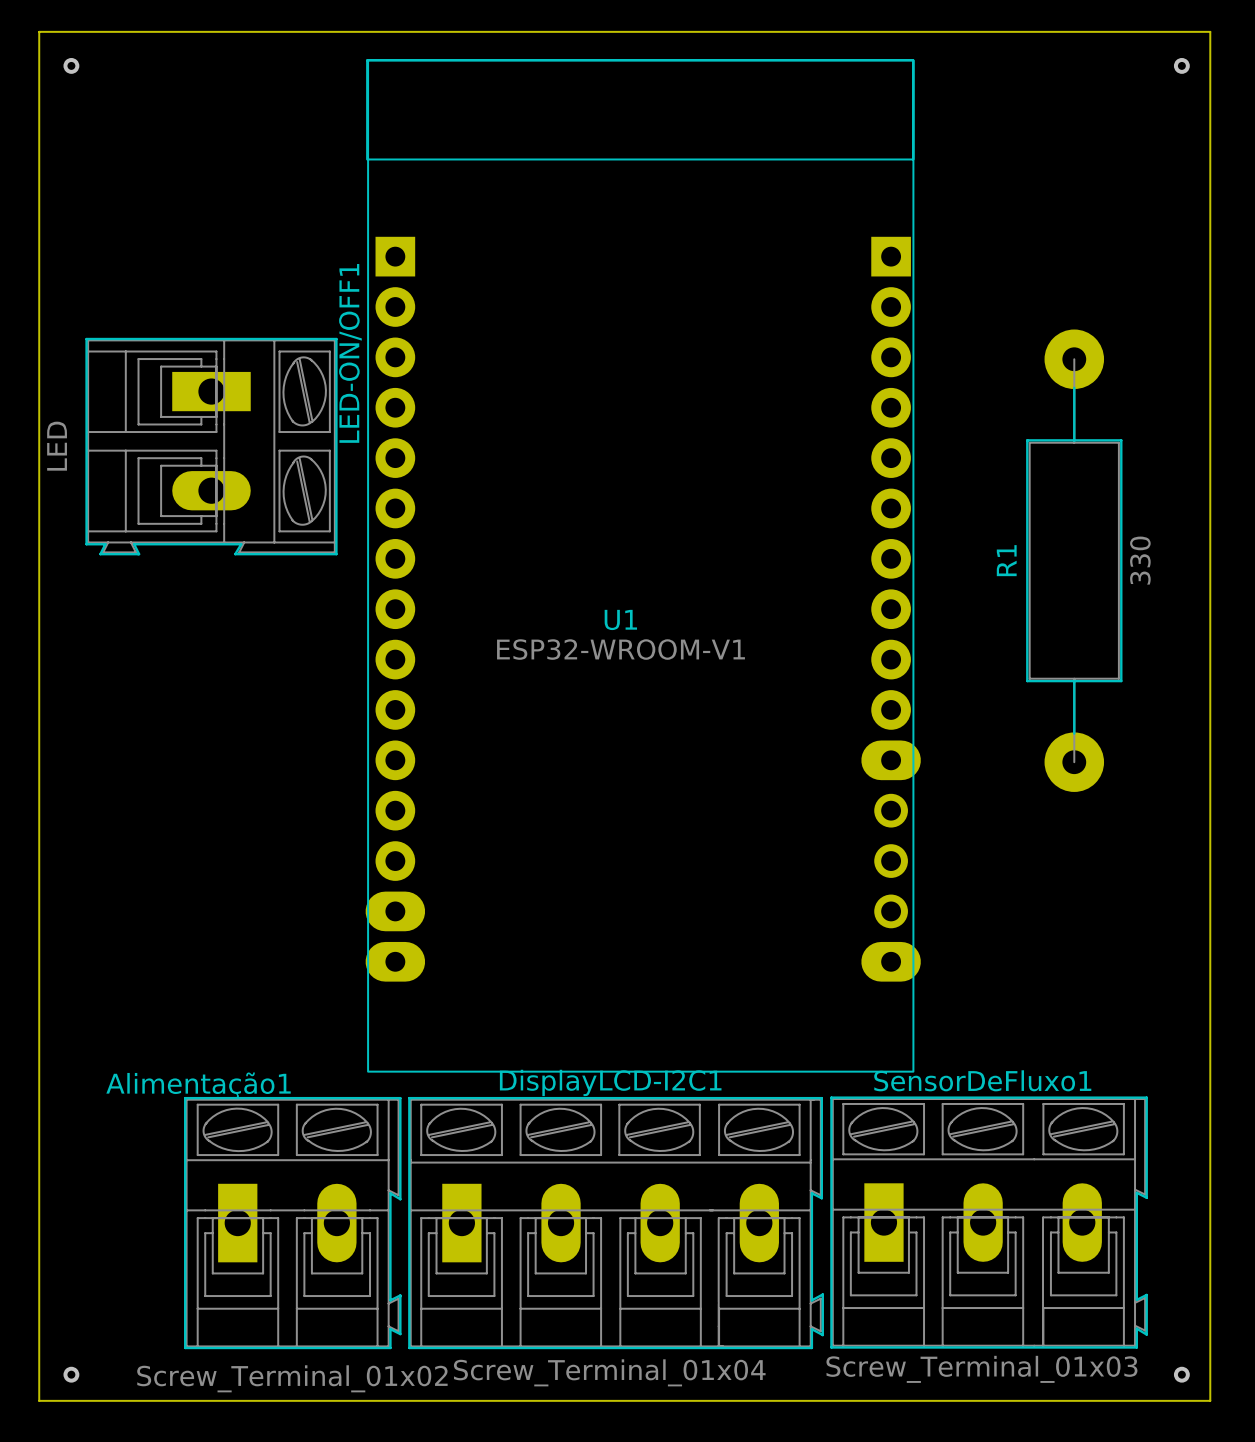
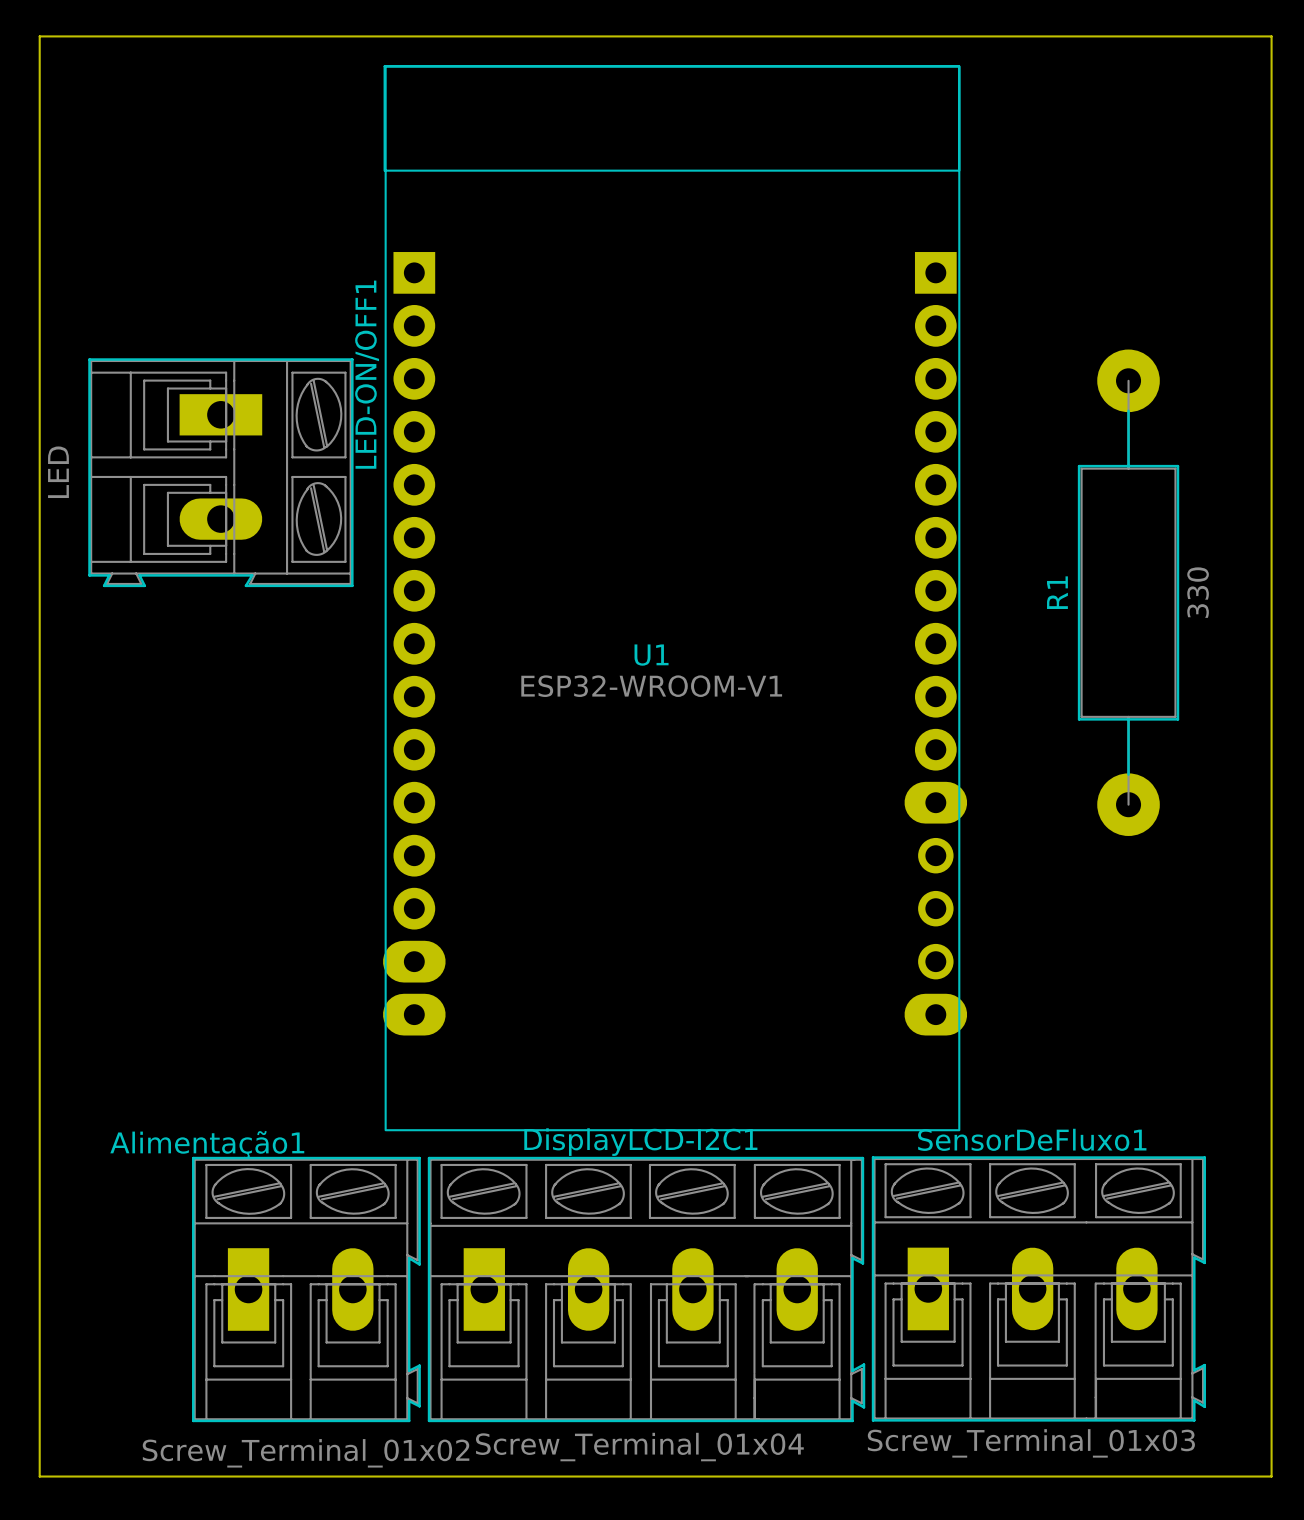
via: (71, 65) -> none
via: (1181, 65) -> none
via: (71, 1374) -> none
via: (1181, 1374) -> none

